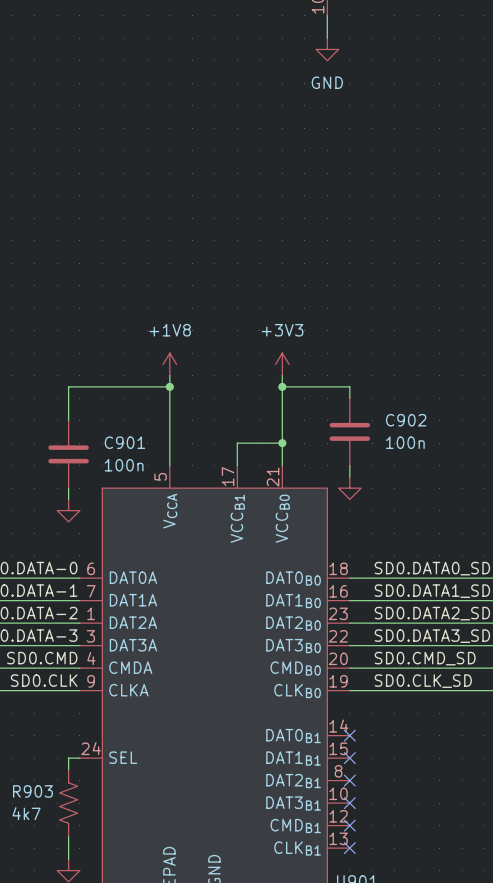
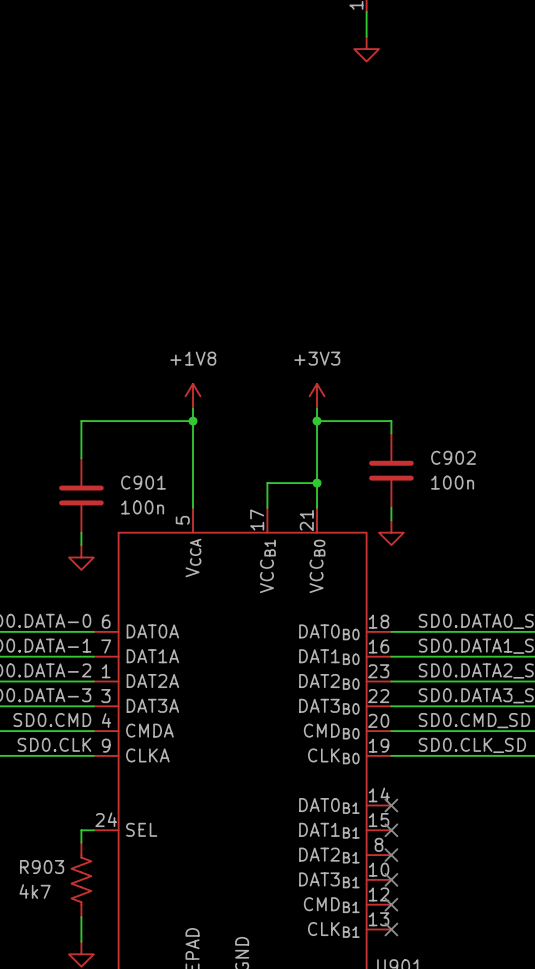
power symbol text: GND (327, 82) -> none

